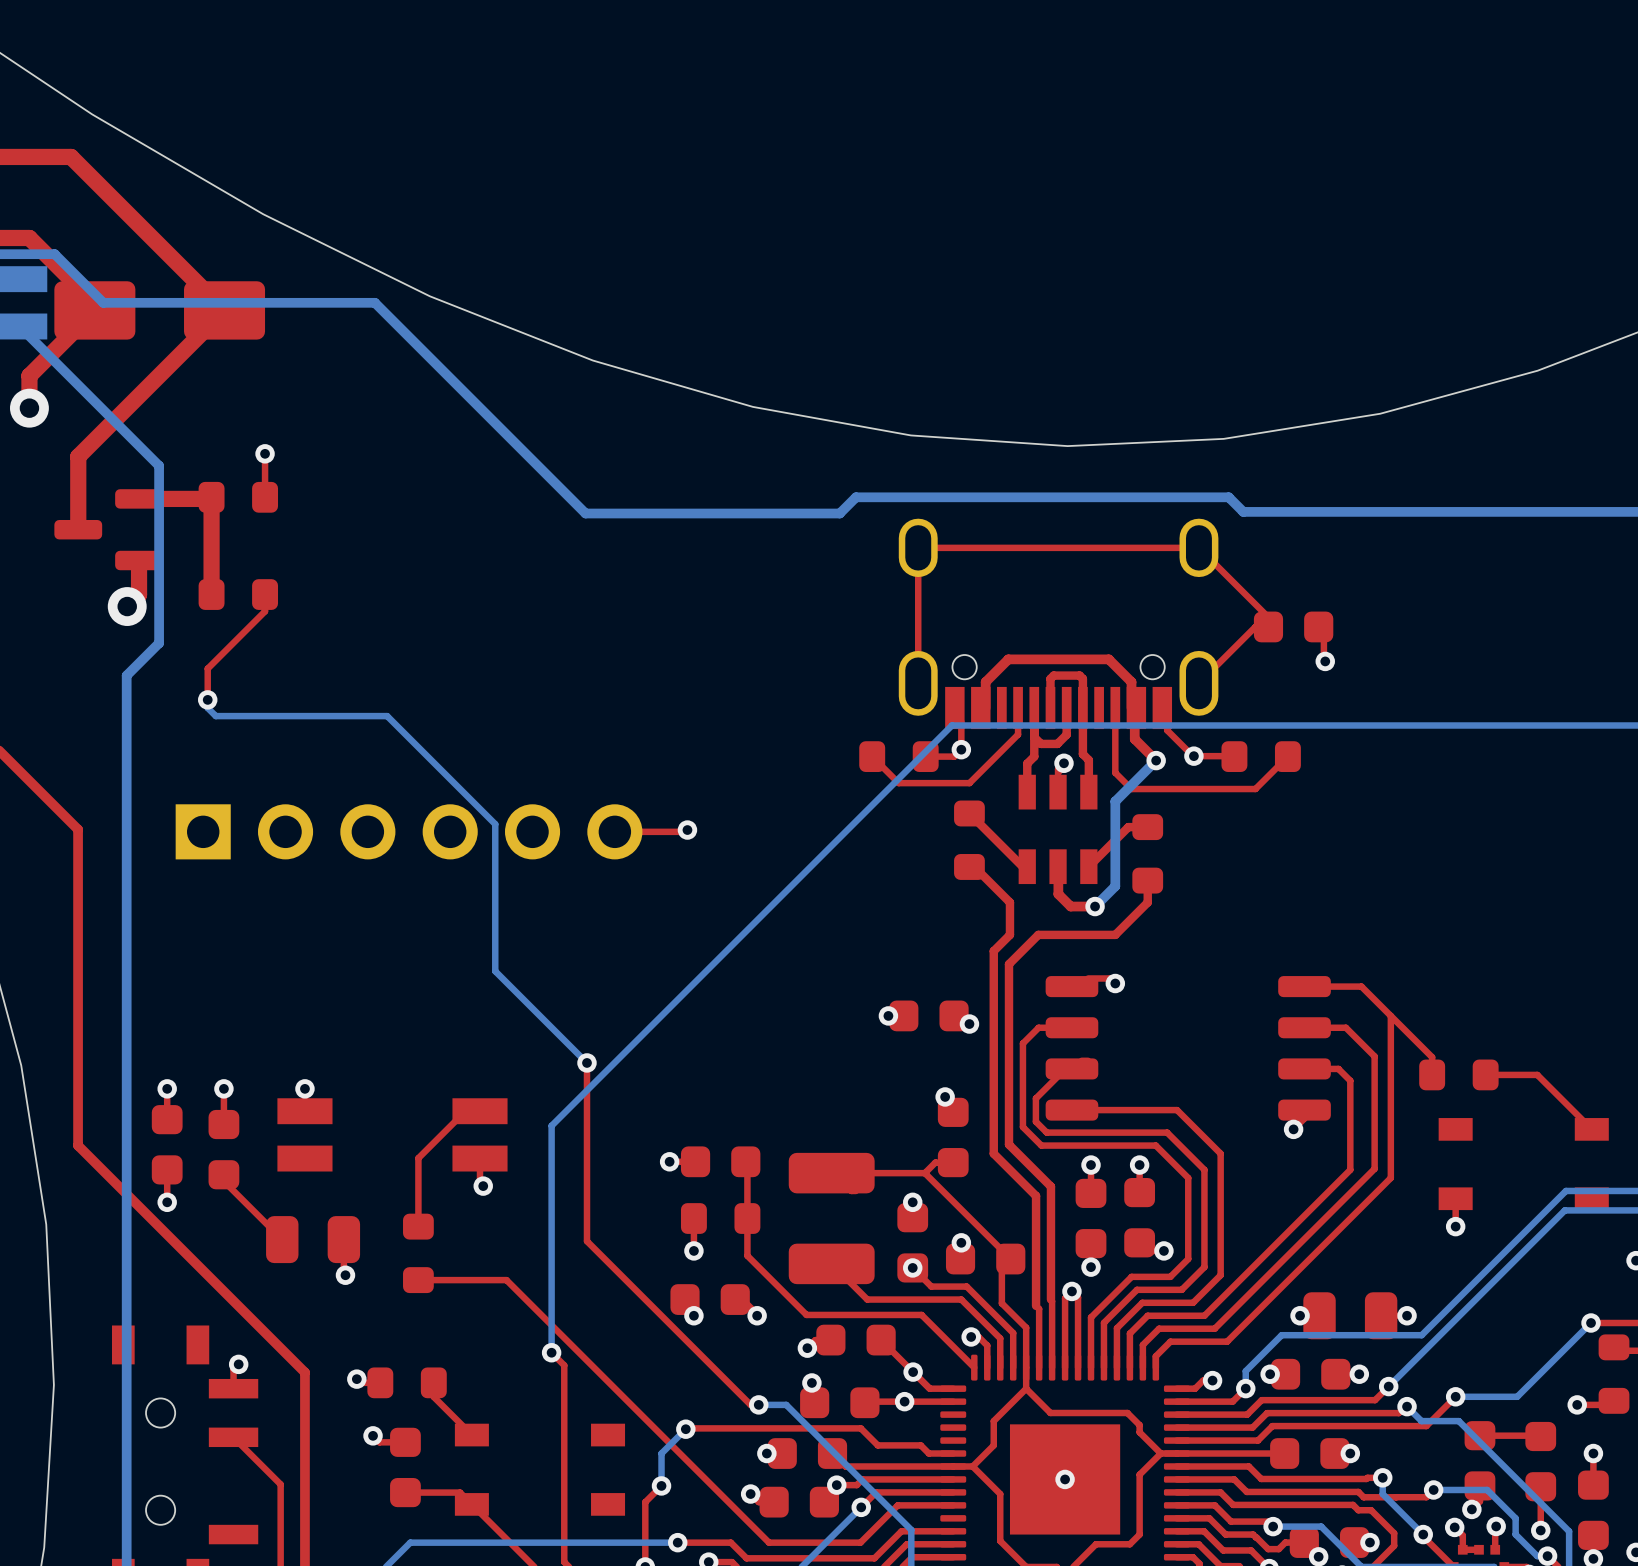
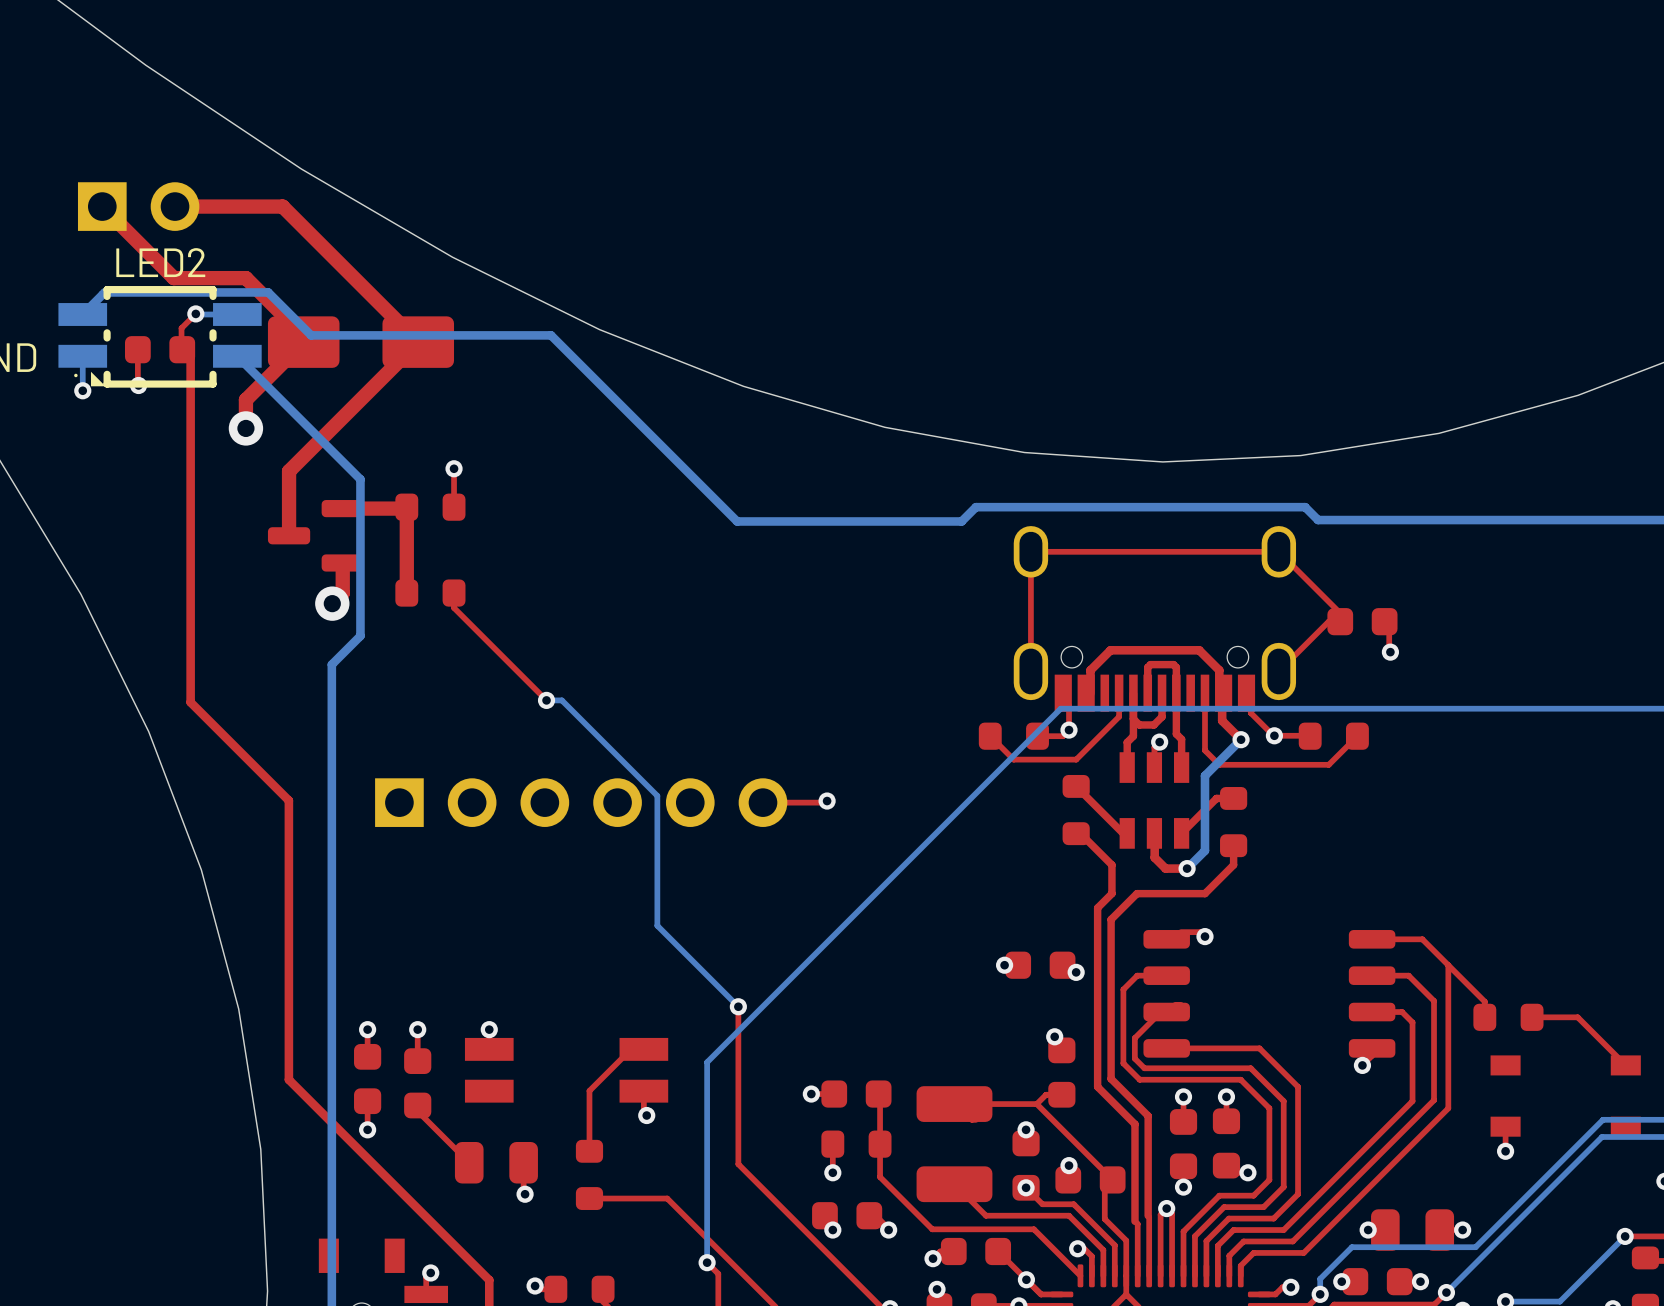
top track: (265, 611) (207, 668) (207, 699) -> (454, 607) (546, 700)
bottom track: (207, 699) (207, 707) (215, 716) (369, 716) -> none
via position: (207, 699) -> (546, 700)

